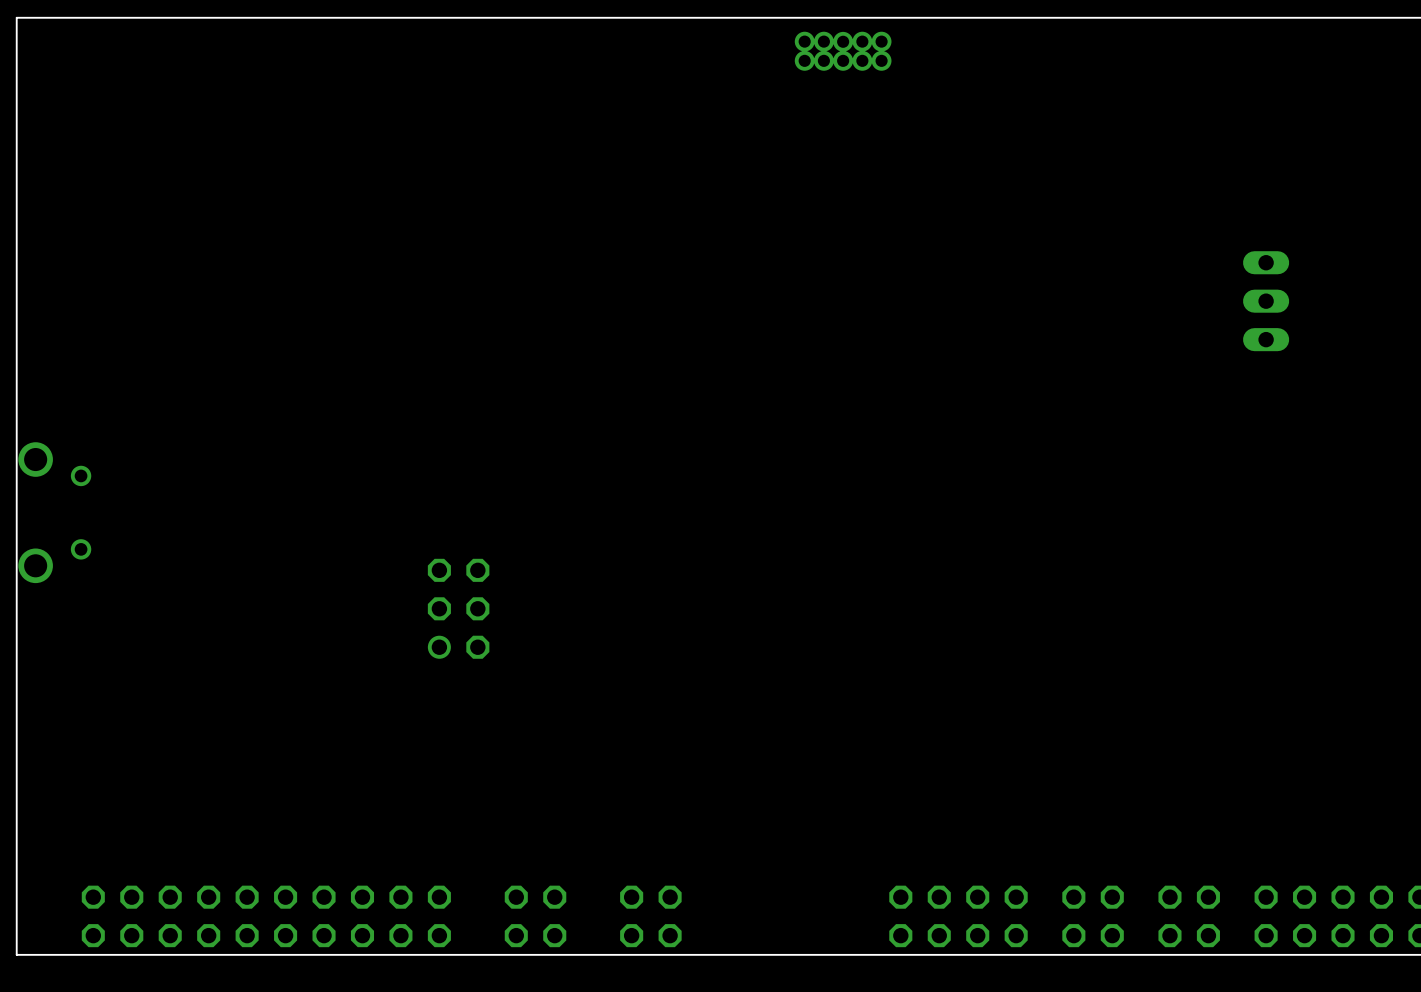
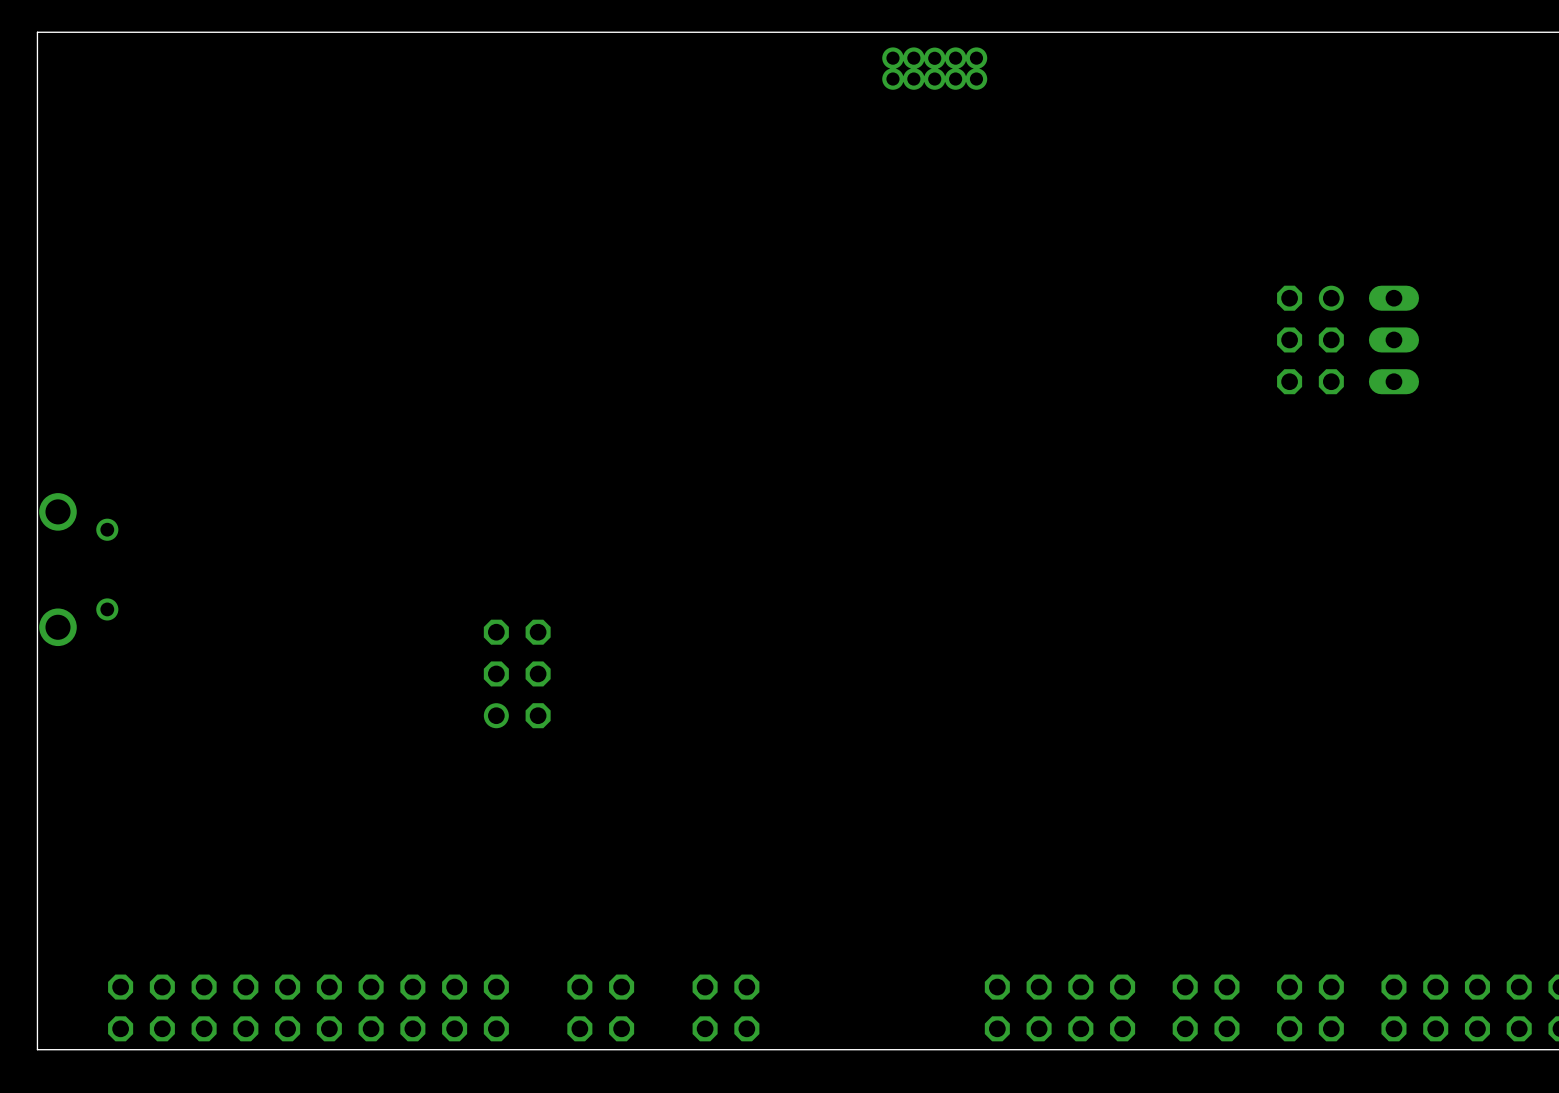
part: none -> (1310, 339)

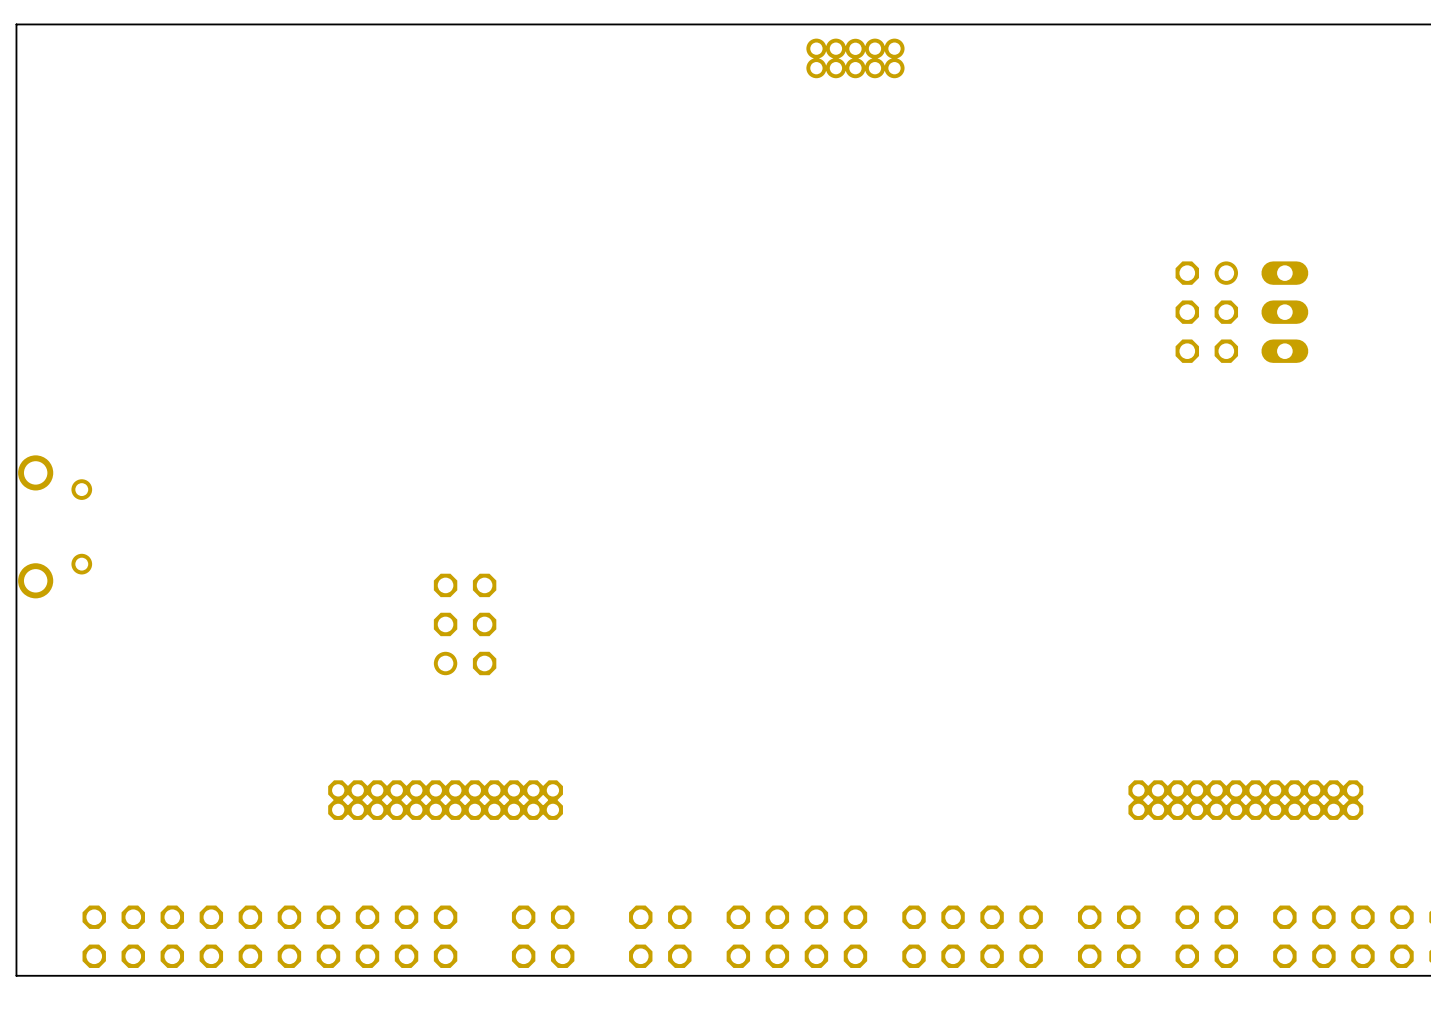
part: none -> (445, 800)
part: none -> (1245, 800)
part: none -> (796, 936)

